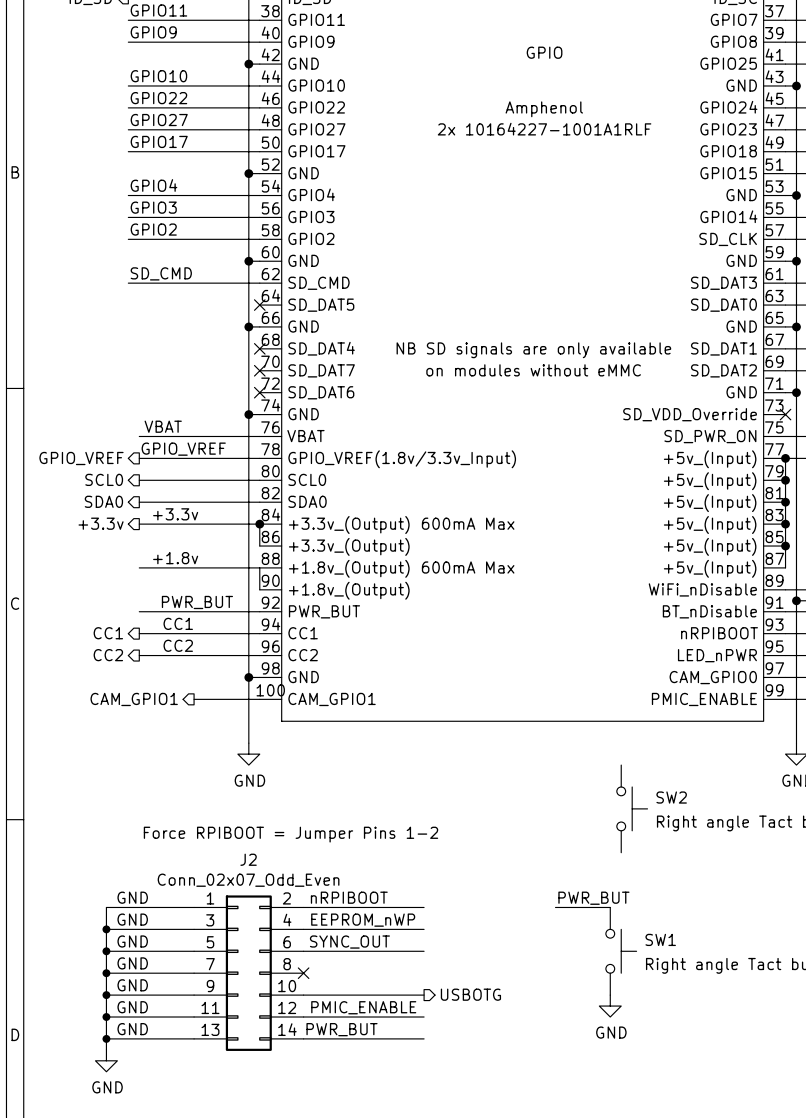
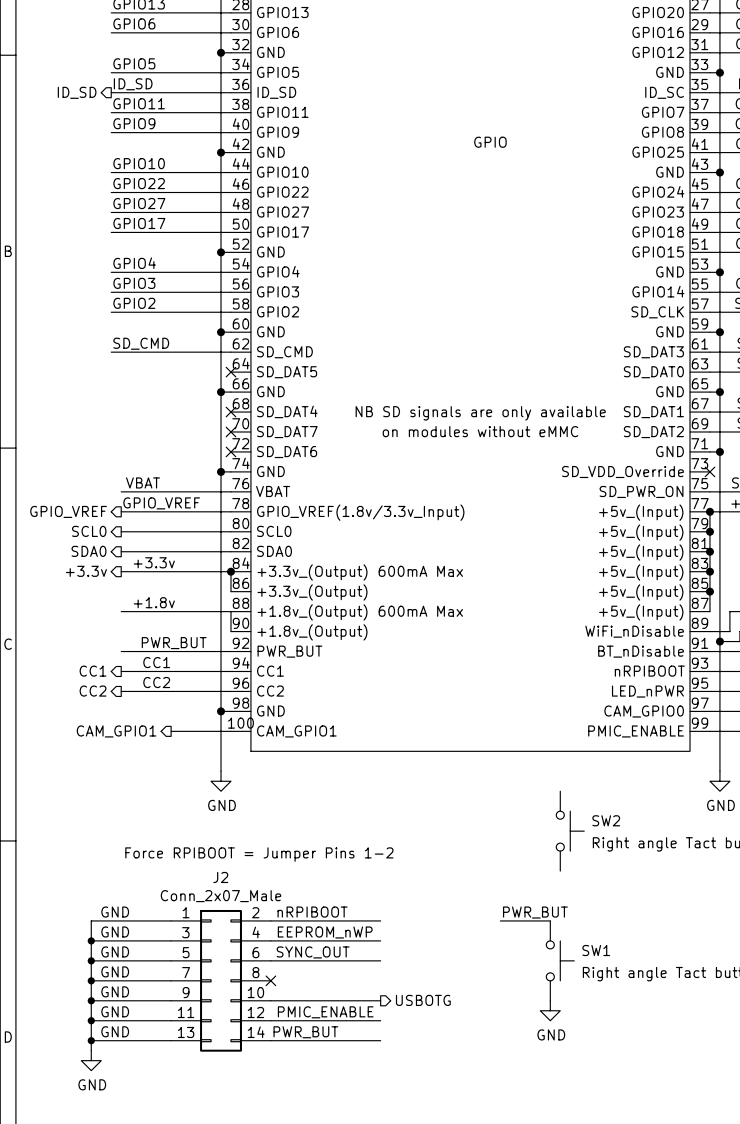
part text: Amphenol (544, 109) -> none
part text: 2x 10164227-1001A1RLF (544, 129) -> none
J2 value: Conn_02x07_Odd_Even (248, 880) -> Conn_2x07_Male (221, 896)

